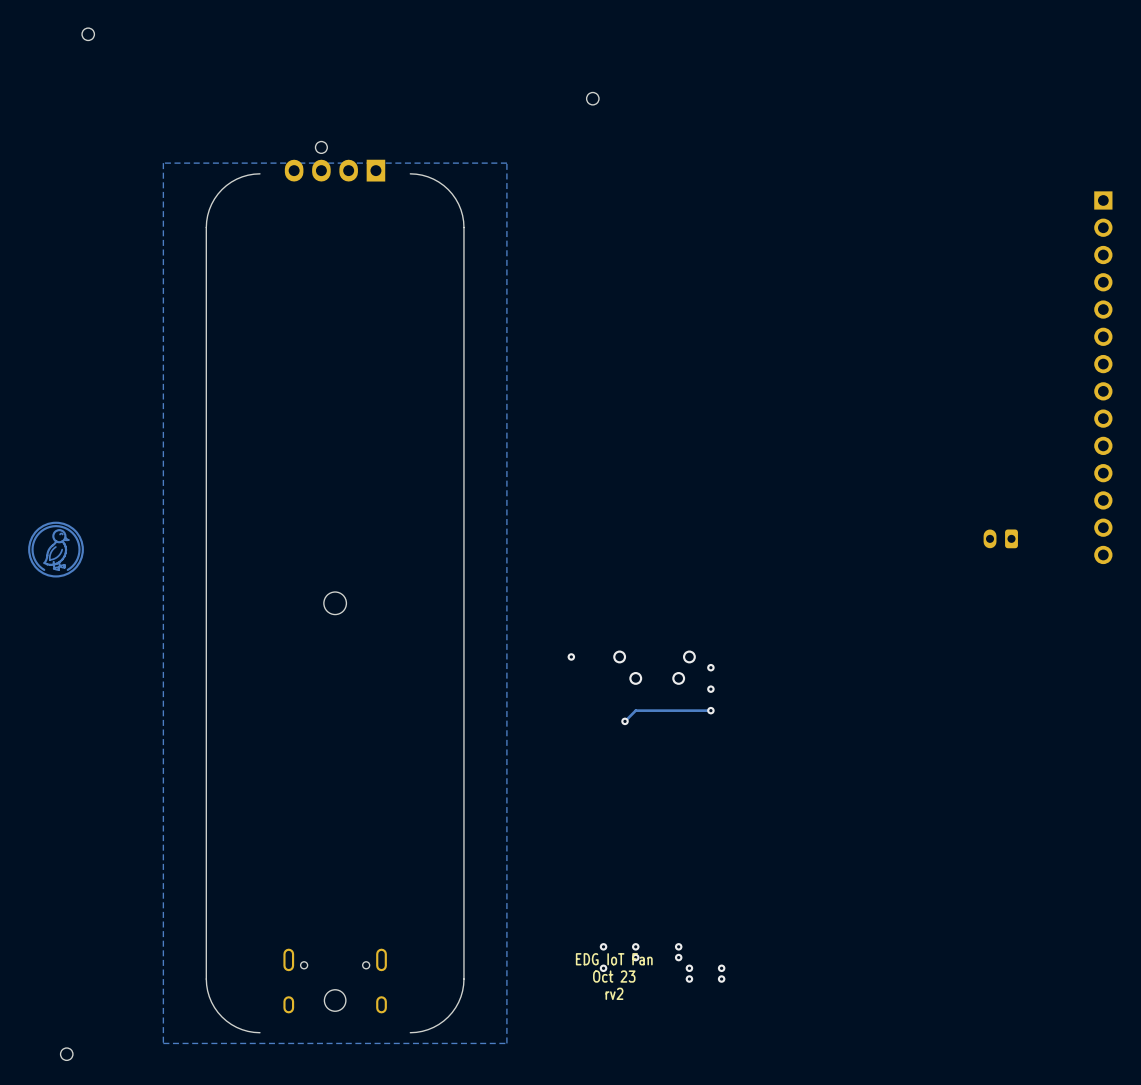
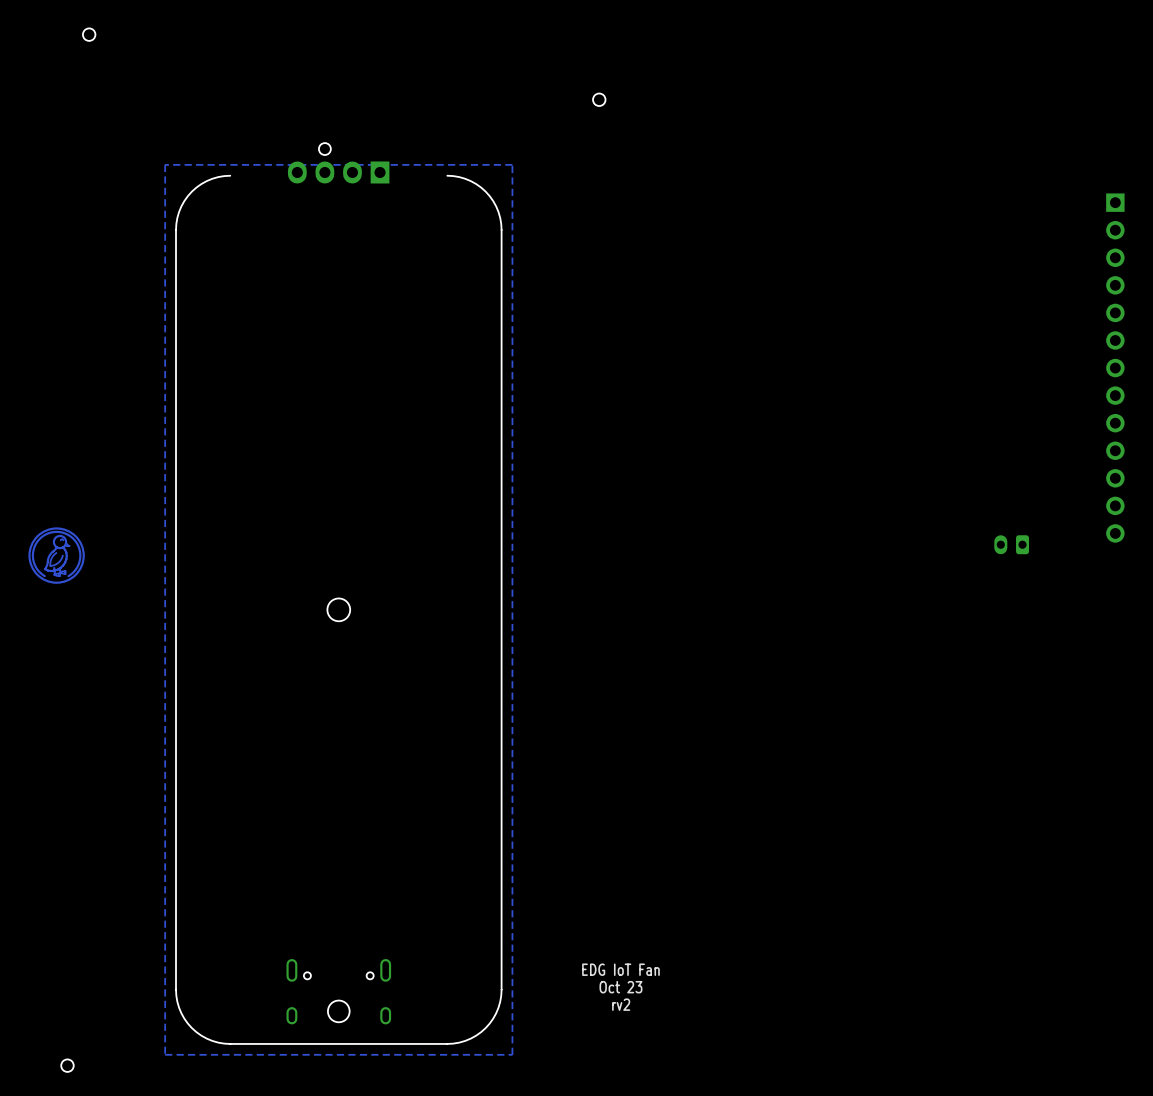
board edge: (259, 173) (236, 179) (222, 189) (211, 204) (206, 227) (206, 985) (211, 1002) (222, 1016) (236, 1027) (259, 1032) -> none
board edge: (410, 173) (428, 176) (448, 189) (458, 204) (463, 227) (463, 985) (458, 1002) (448, 1016) (428, 1029) (410, 1032) -> none
board edge: none -> (447, 175) (465, 178) (485, 191) (498, 212) (501, 230) (501, 995) (493, 1018) (481, 1032) (465, 1040) (447, 1043) (224, 1043) (212, 1040) (196, 1032) (184, 1018) (177, 1001) (176, 223) (181, 206) (191, 191) (206, 181) (230, 175)
part: (1103, 377) -> none
via: (571, 656) -> none
via: (619, 656) -> none
via: (689, 656) -> none
via: (710, 667) -> none
via: (635, 678) -> none
via: (678, 678) -> none
via: (710, 689) -> none
track: (710, 710) (635, 710) (625, 721) -> none
via: (710, 710) -> none
via: (625, 721) -> none
via: (603, 946) -> none
via: (635, 946) -> none
via: (678, 946) -> none
via: (635, 957) -> none
via: (678, 957) -> none
via: (603, 968) -> none
via: (689, 968) -> none
via: (721, 968) -> none
via: (689, 979) -> none
via: (721, 979) -> none

